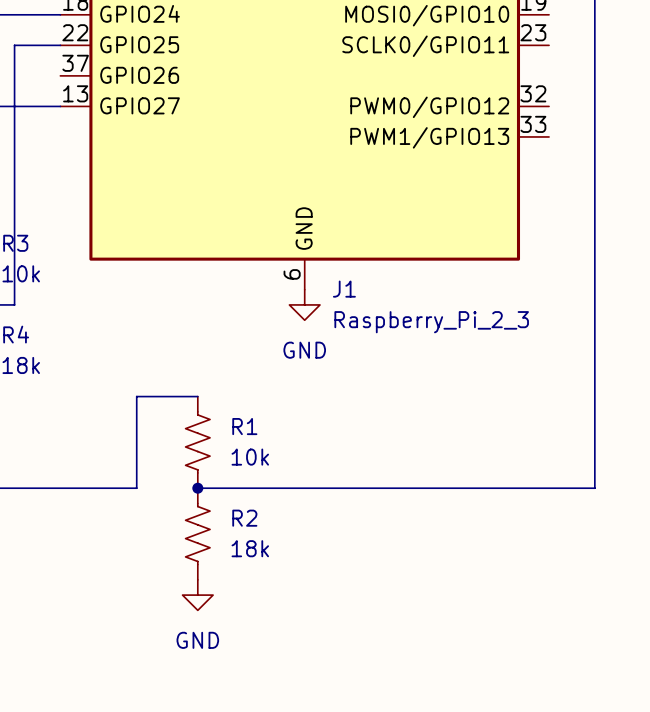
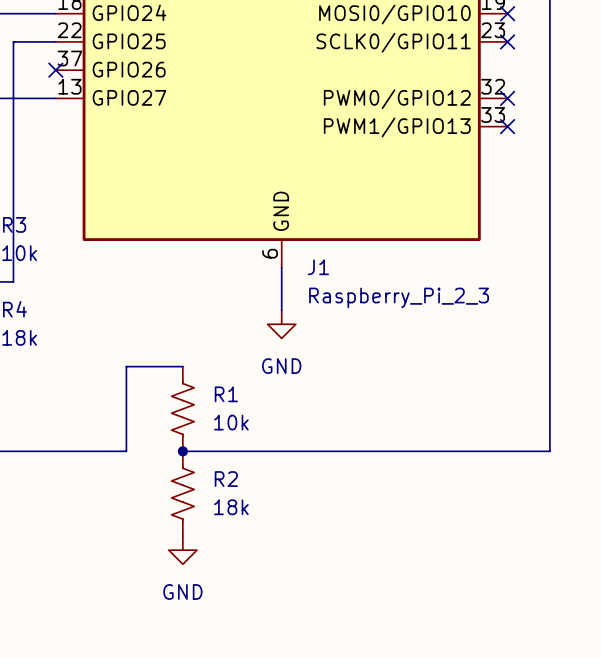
no-connect mark: none -> (507, 13)
no-connect mark: none -> (507, 41)
no-connect mark: none -> (55, 70)
no-connect mark: none -> (507, 98)
no-connect mark: none -> (507, 126)
wire: none -> (281, 267) (281, 310)
power symbol position: GND (304, 304) -> GND (281, 324)

